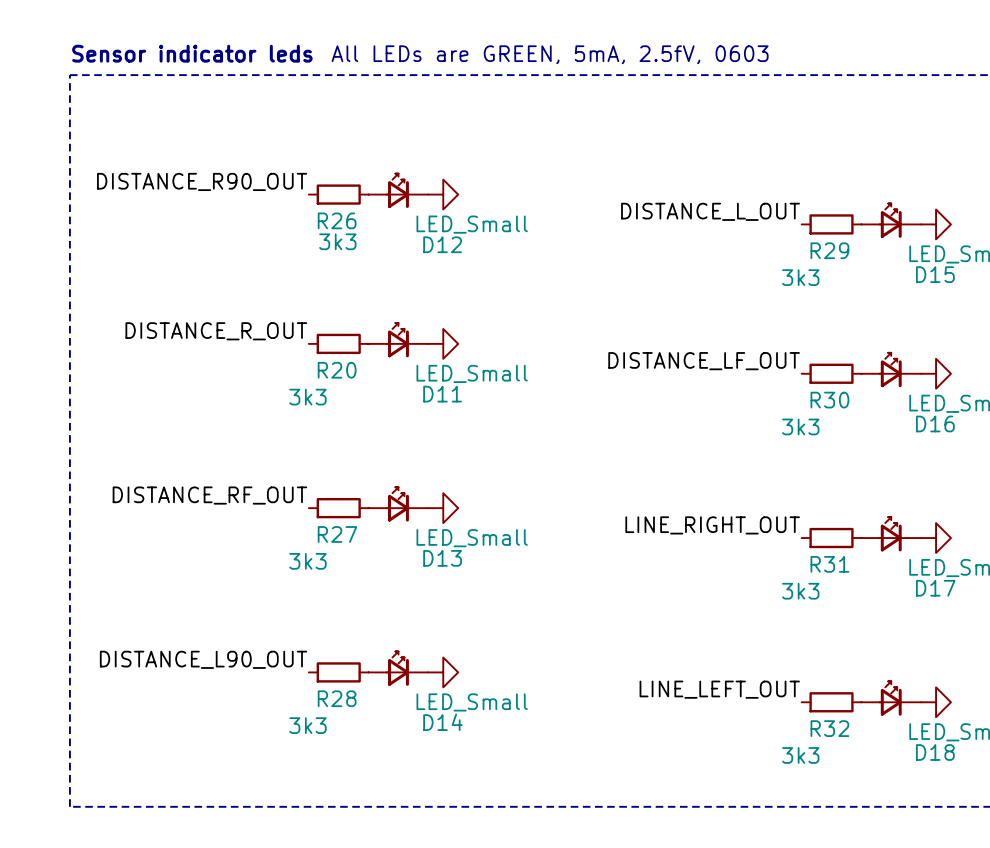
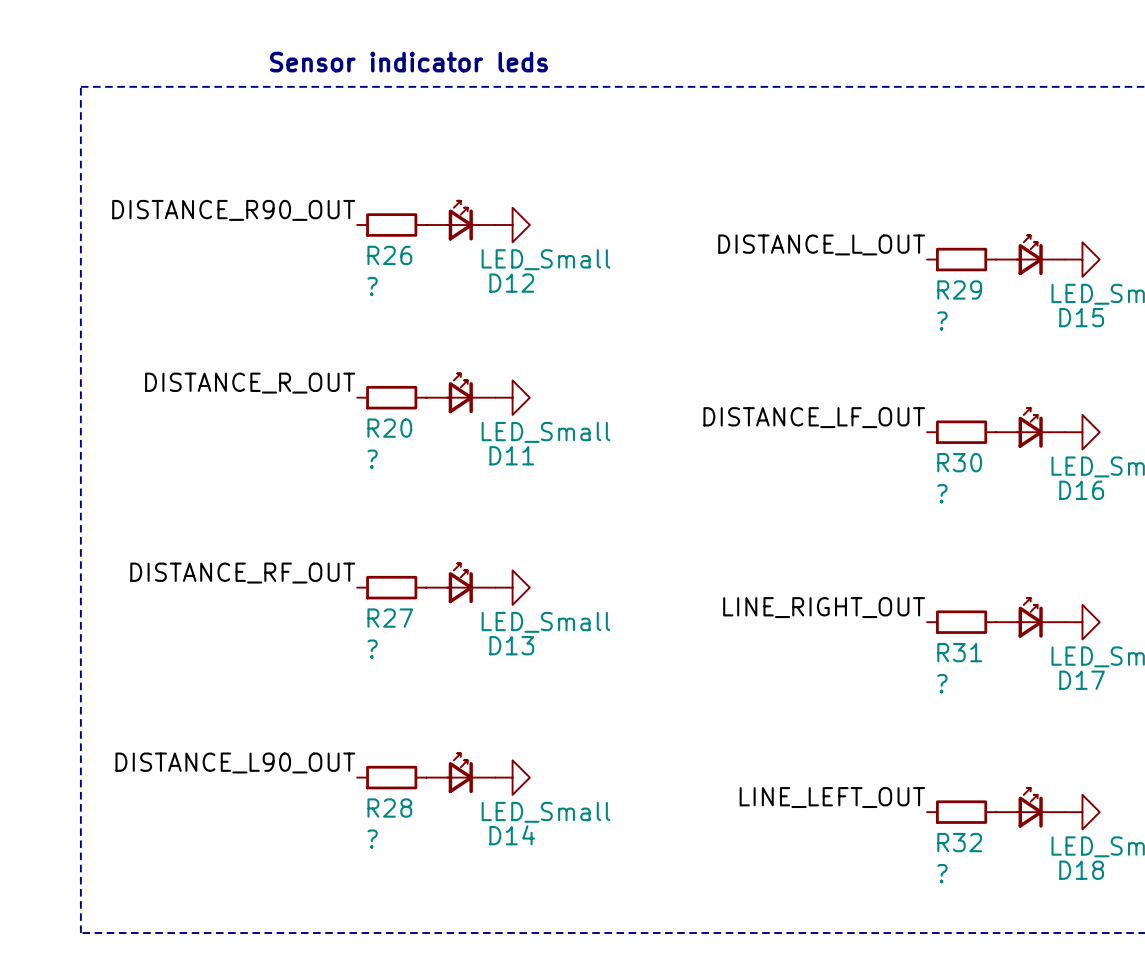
text position: Sensor indicator leds (192, 53) -> Sensor indicator leds (408, 62)
text: All LEDs are GREEN, 5mA, 2.5fV, 0603 (550, 54) -> none
R26 value: 3k3 (337, 241) -> ? (372, 286)
R29 value: 3k3 (800, 277) -> ? (942, 321)
R20 value: 3k3 (307, 397) -> ? (372, 459)
R30 value: 3k3 (800, 426) -> ? (942, 493)
R27 value: 3k3 (307, 561) -> ? (372, 649)
R31 value: 3k3 (800, 591) -> ? (942, 683)
R28 value: 3k3 (307, 725) -> ? (372, 839)
R32 value: 3k3 (800, 755) -> ? (942, 873)

